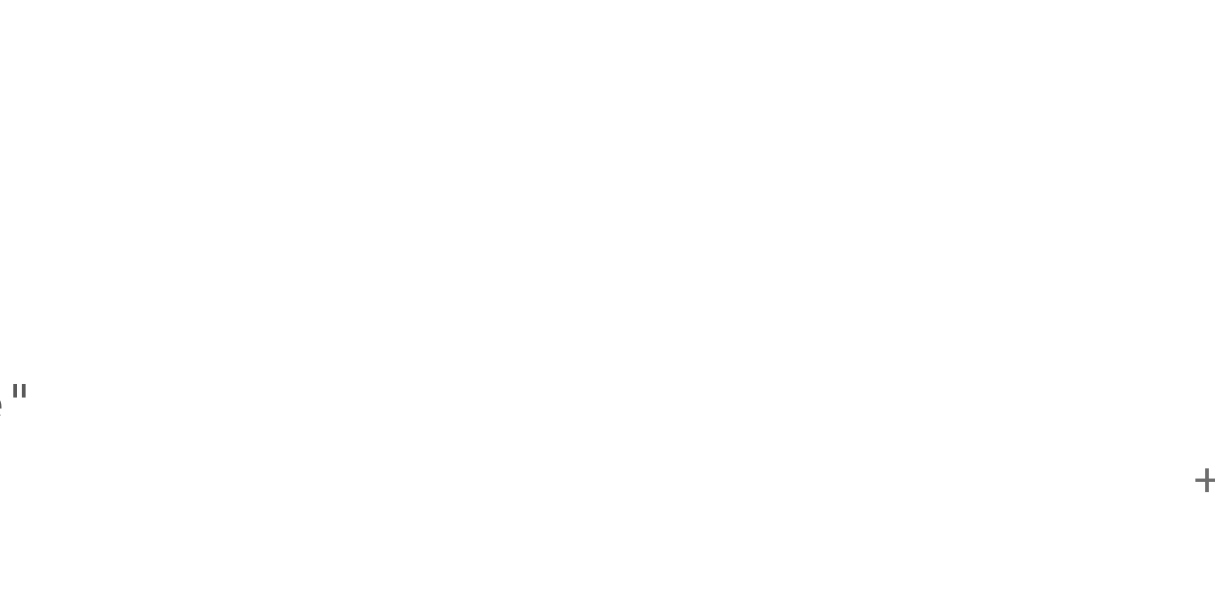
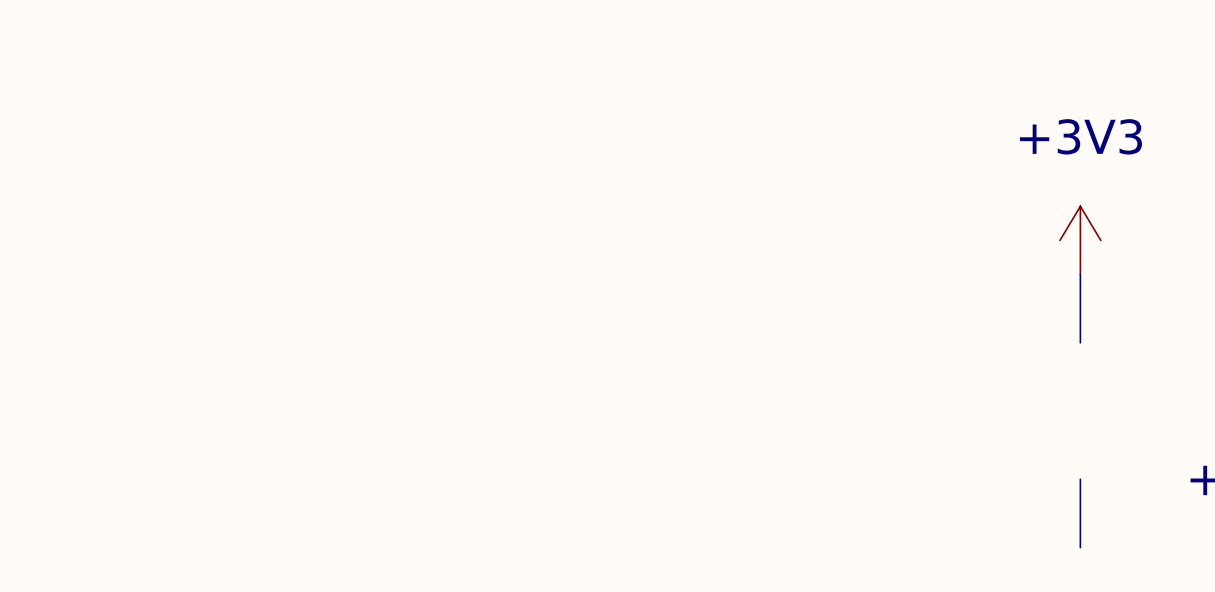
power symbol: none -> +3V3 (1080, 240)
wire: none -> (1080, 274) (1080, 342)
wire: none -> (1080, 479) (1080, 547)

